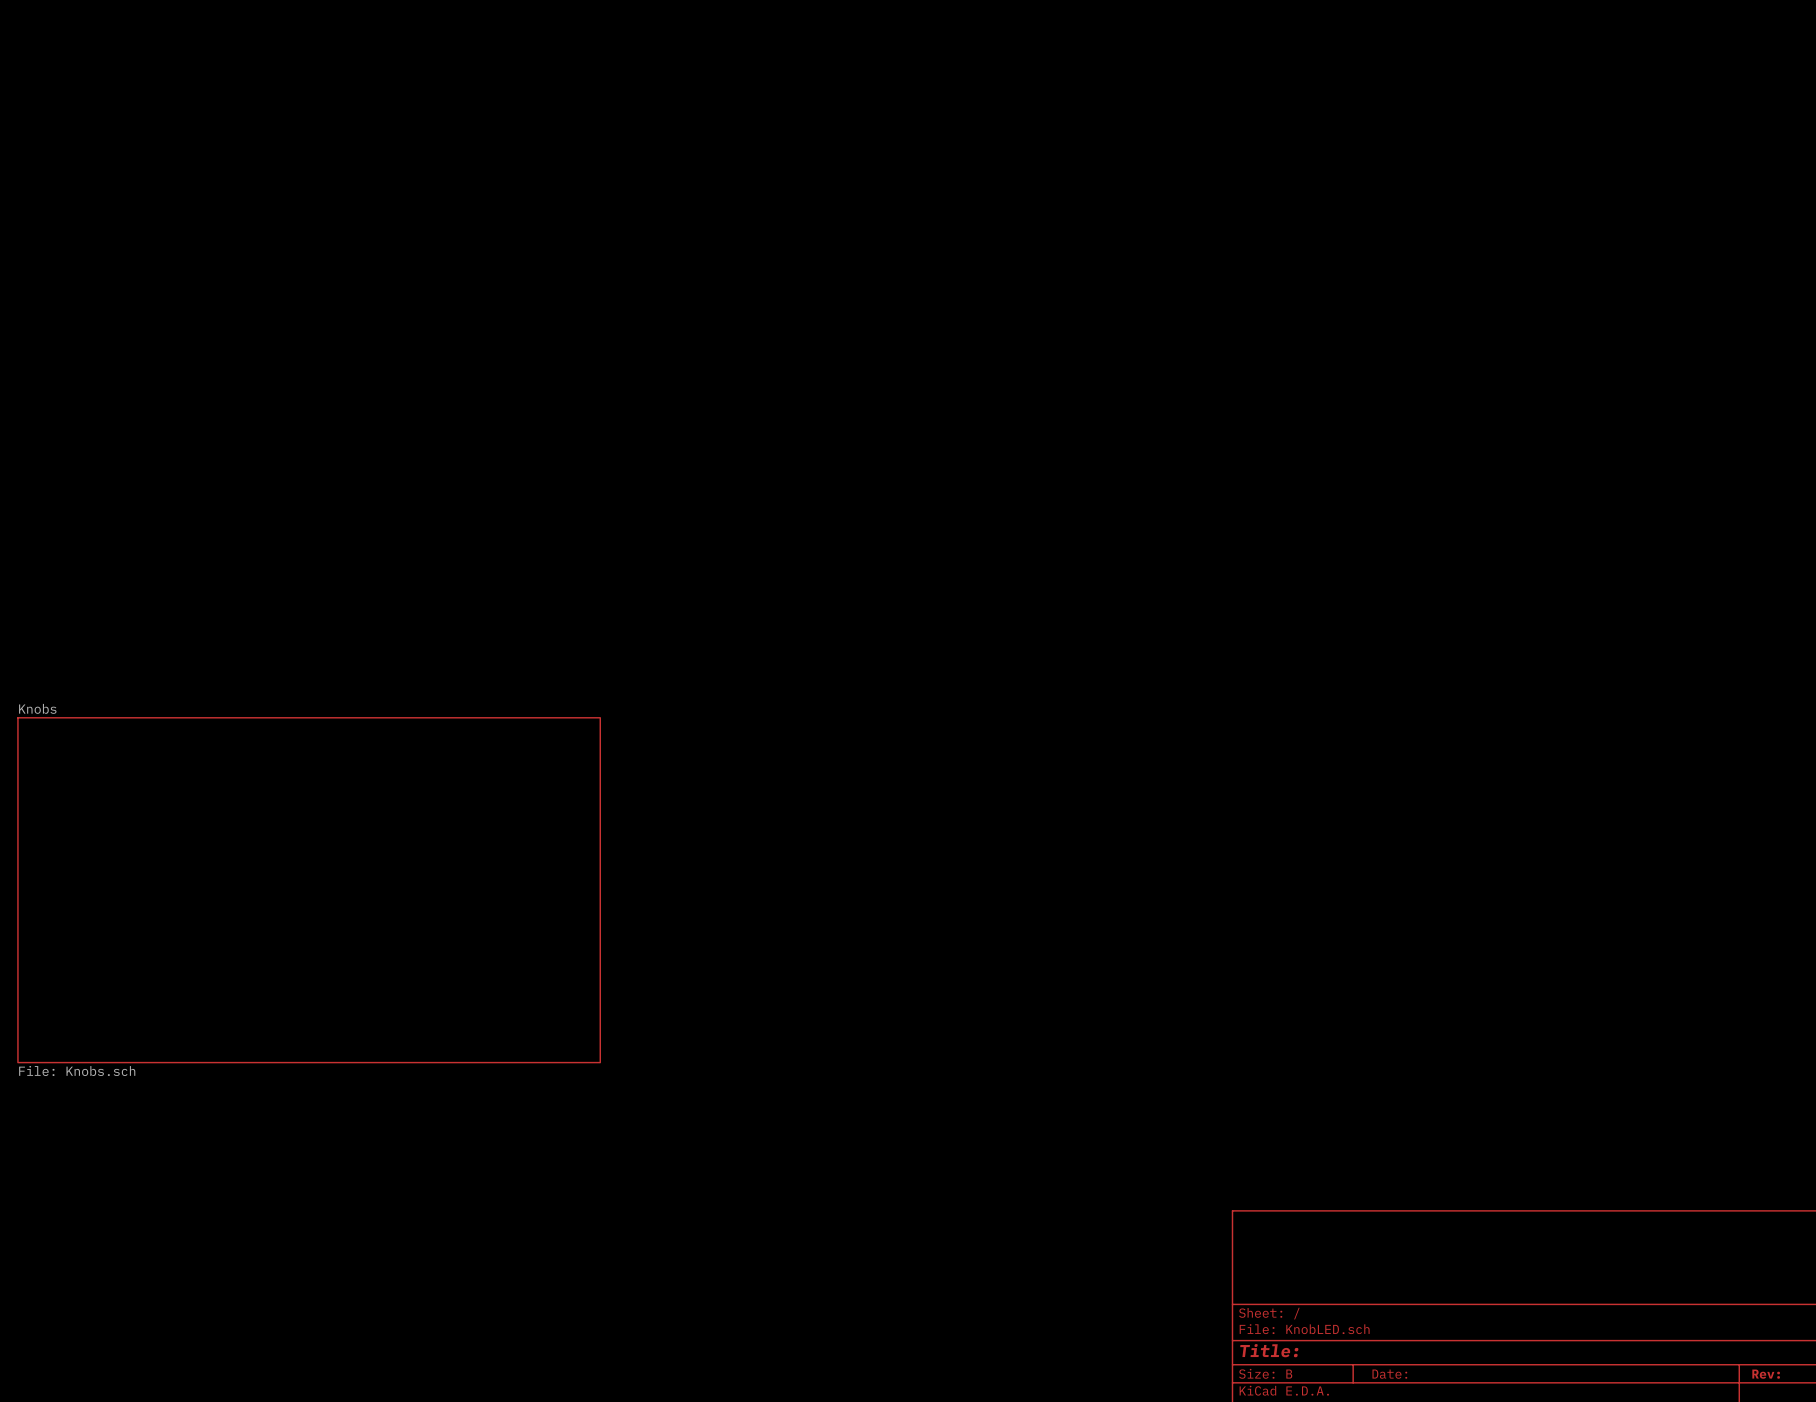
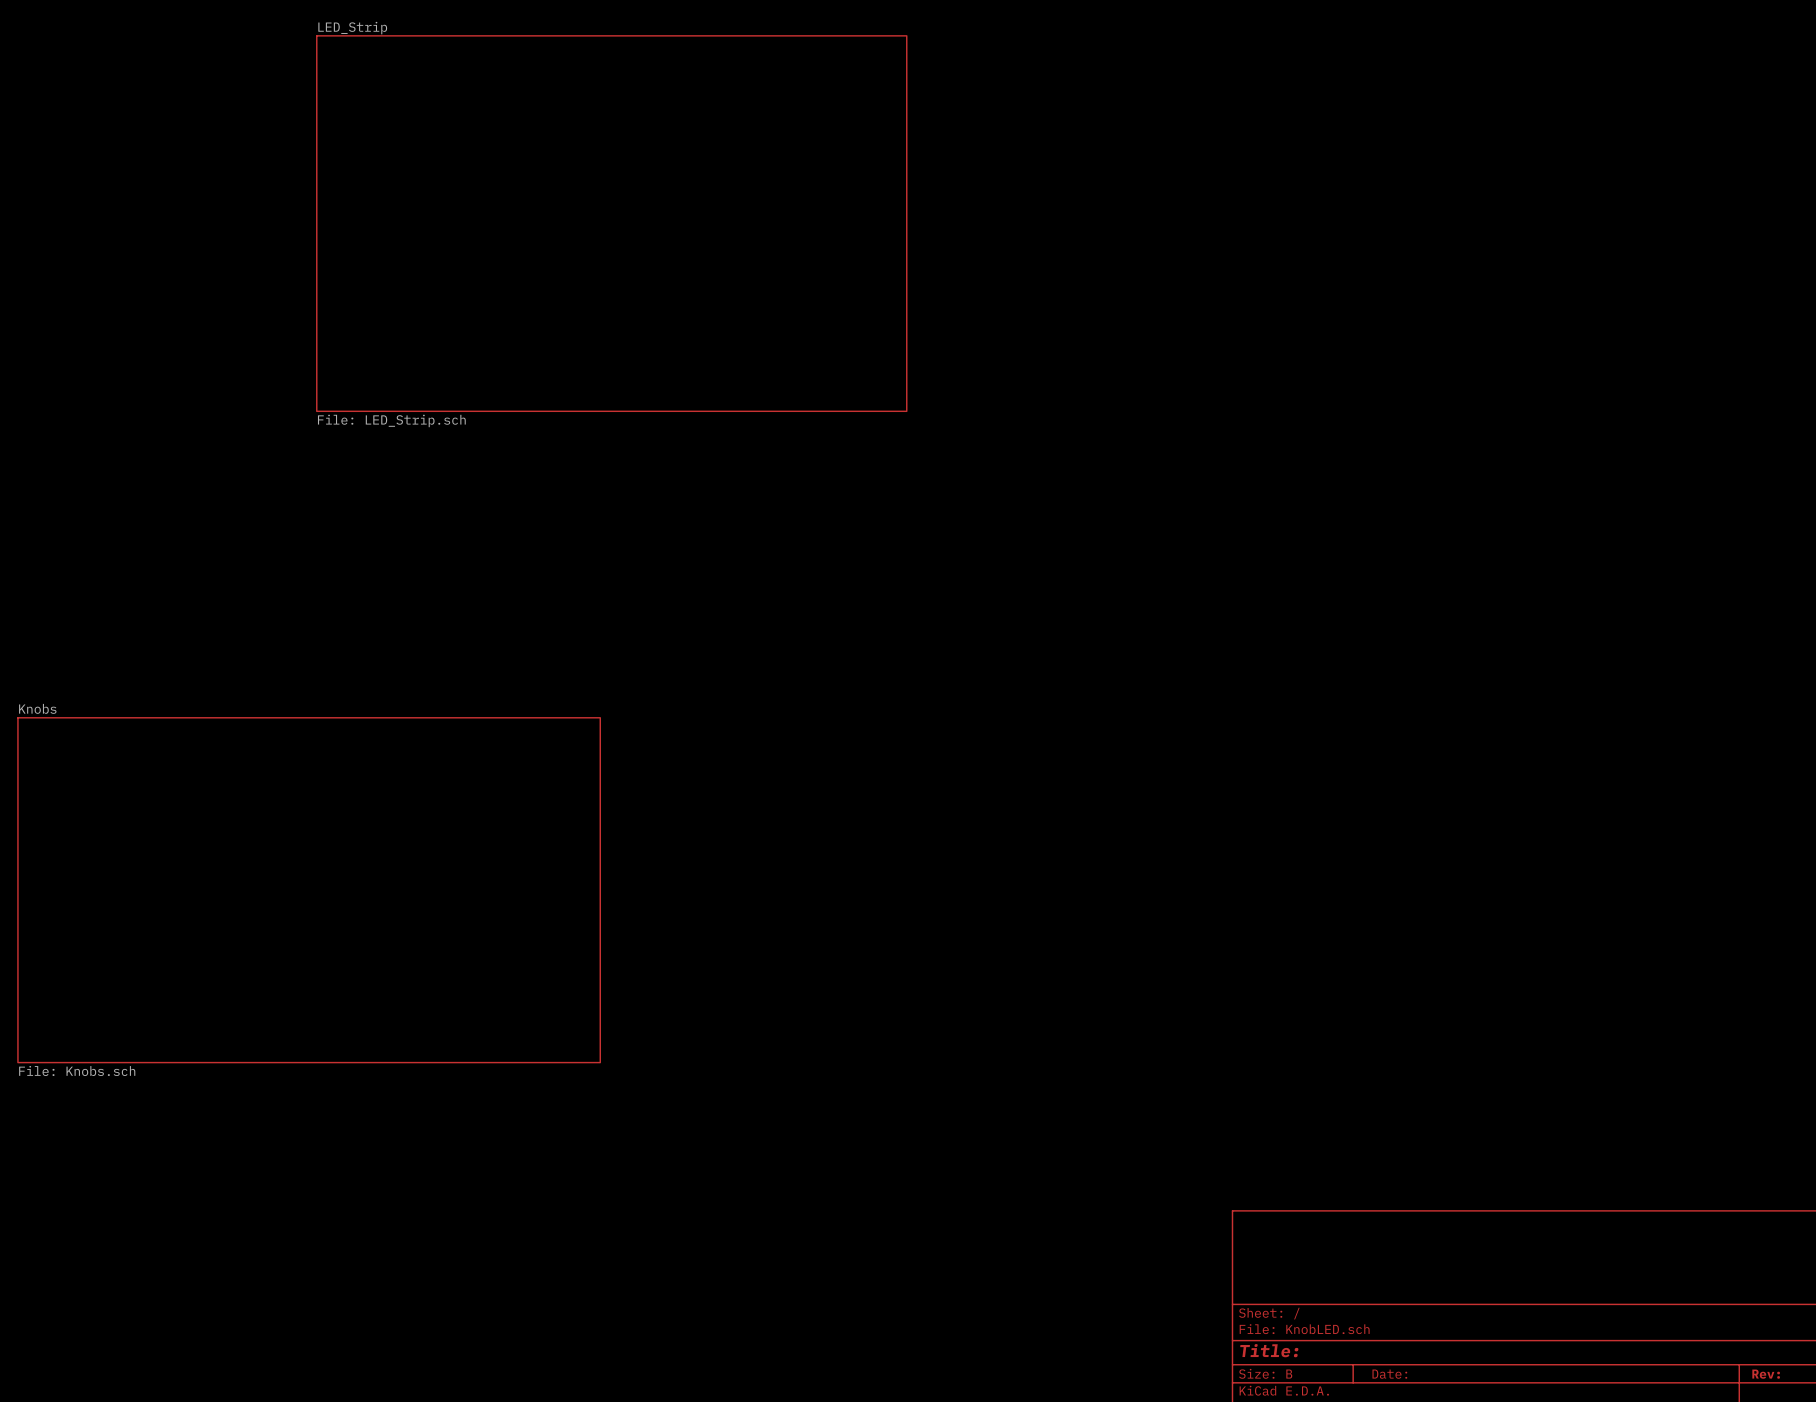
sheet LED_Strip: none -> File: LED_Strip.sch (611, 223)

